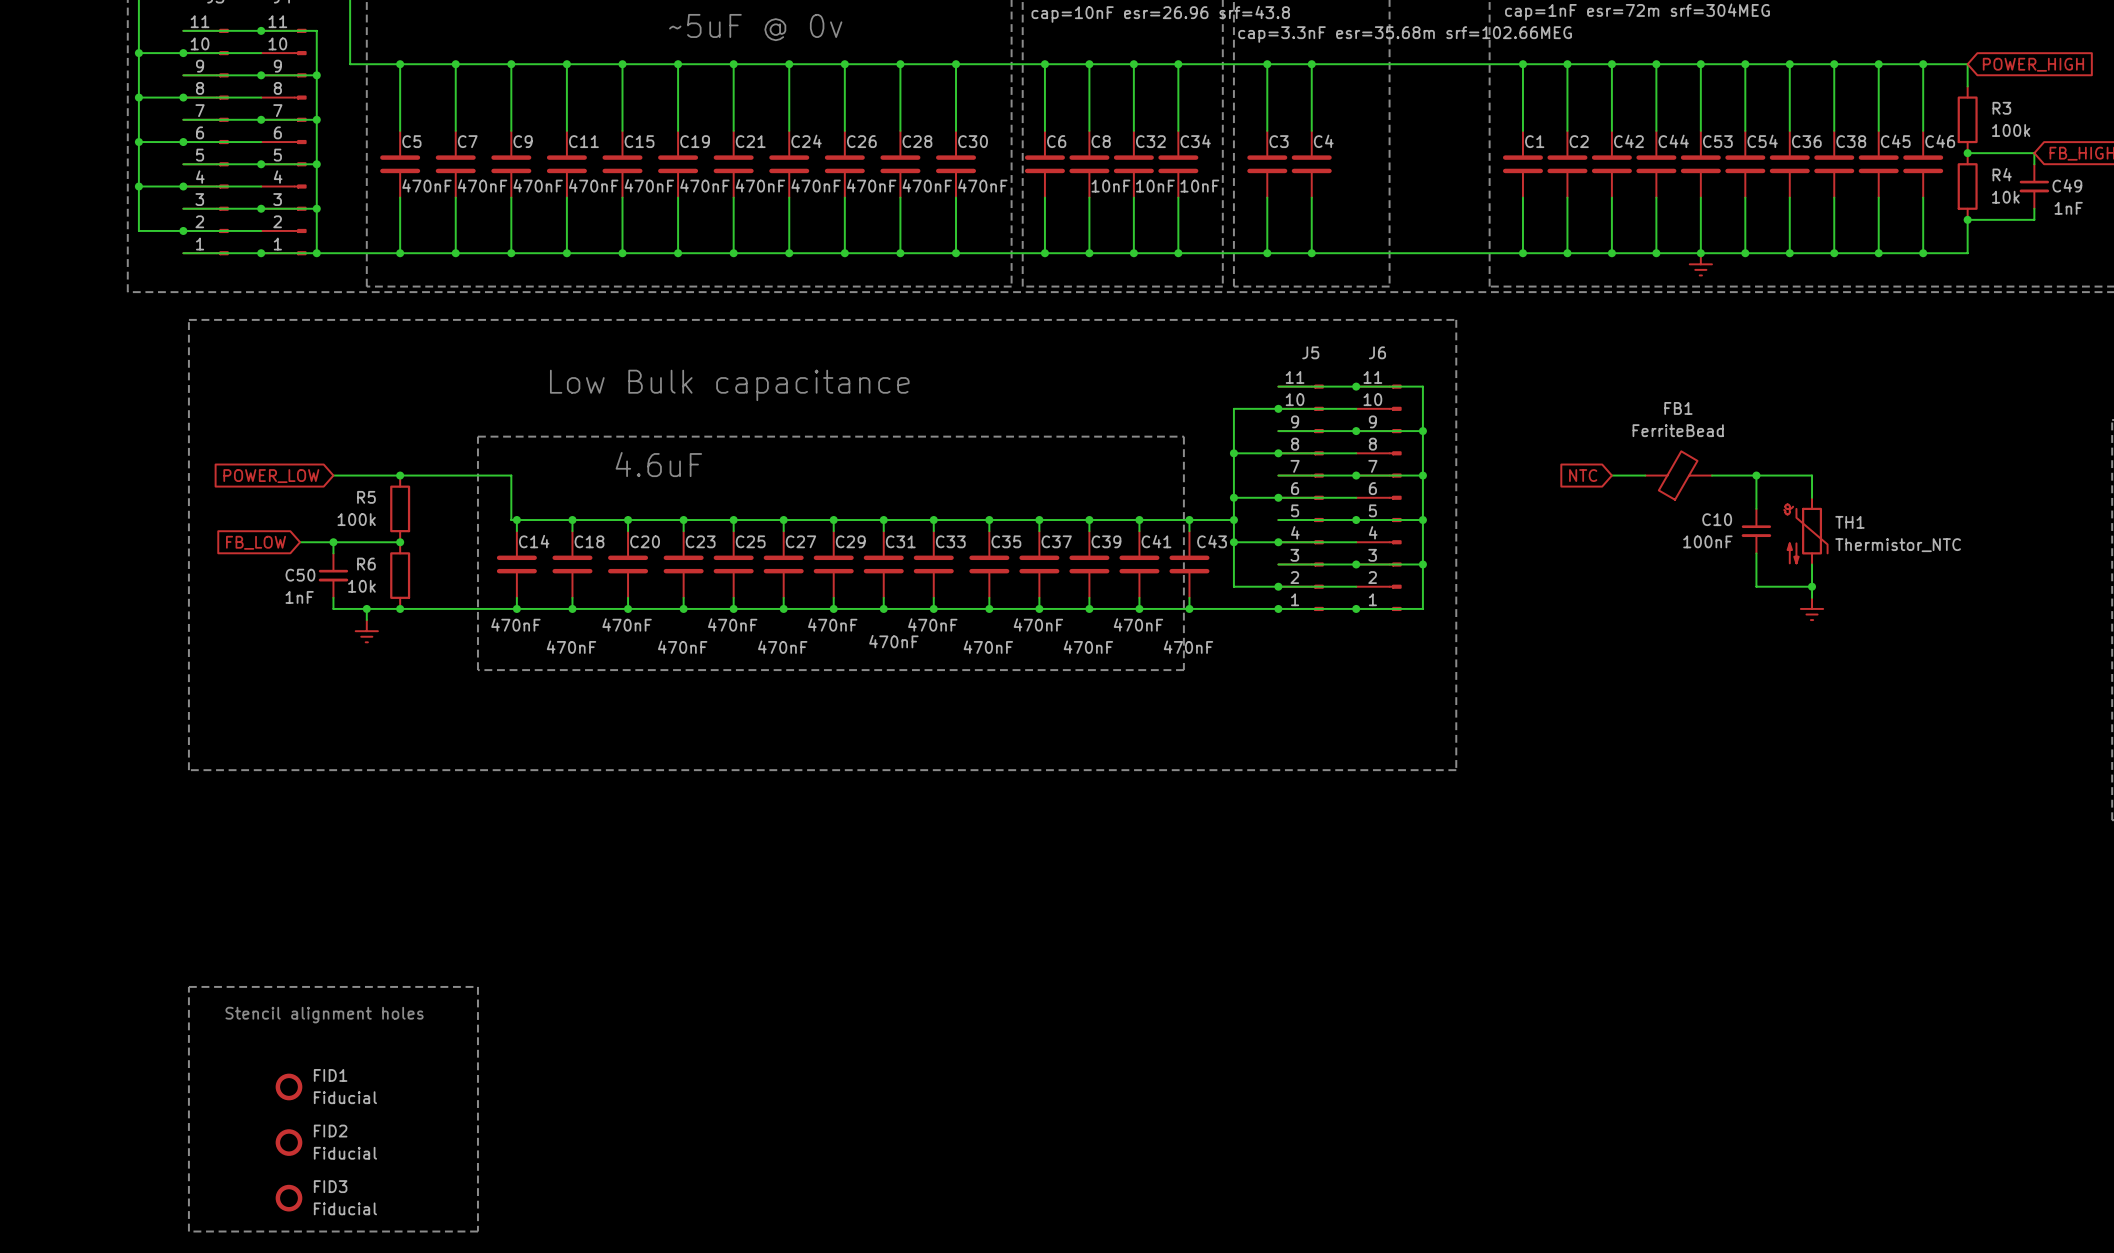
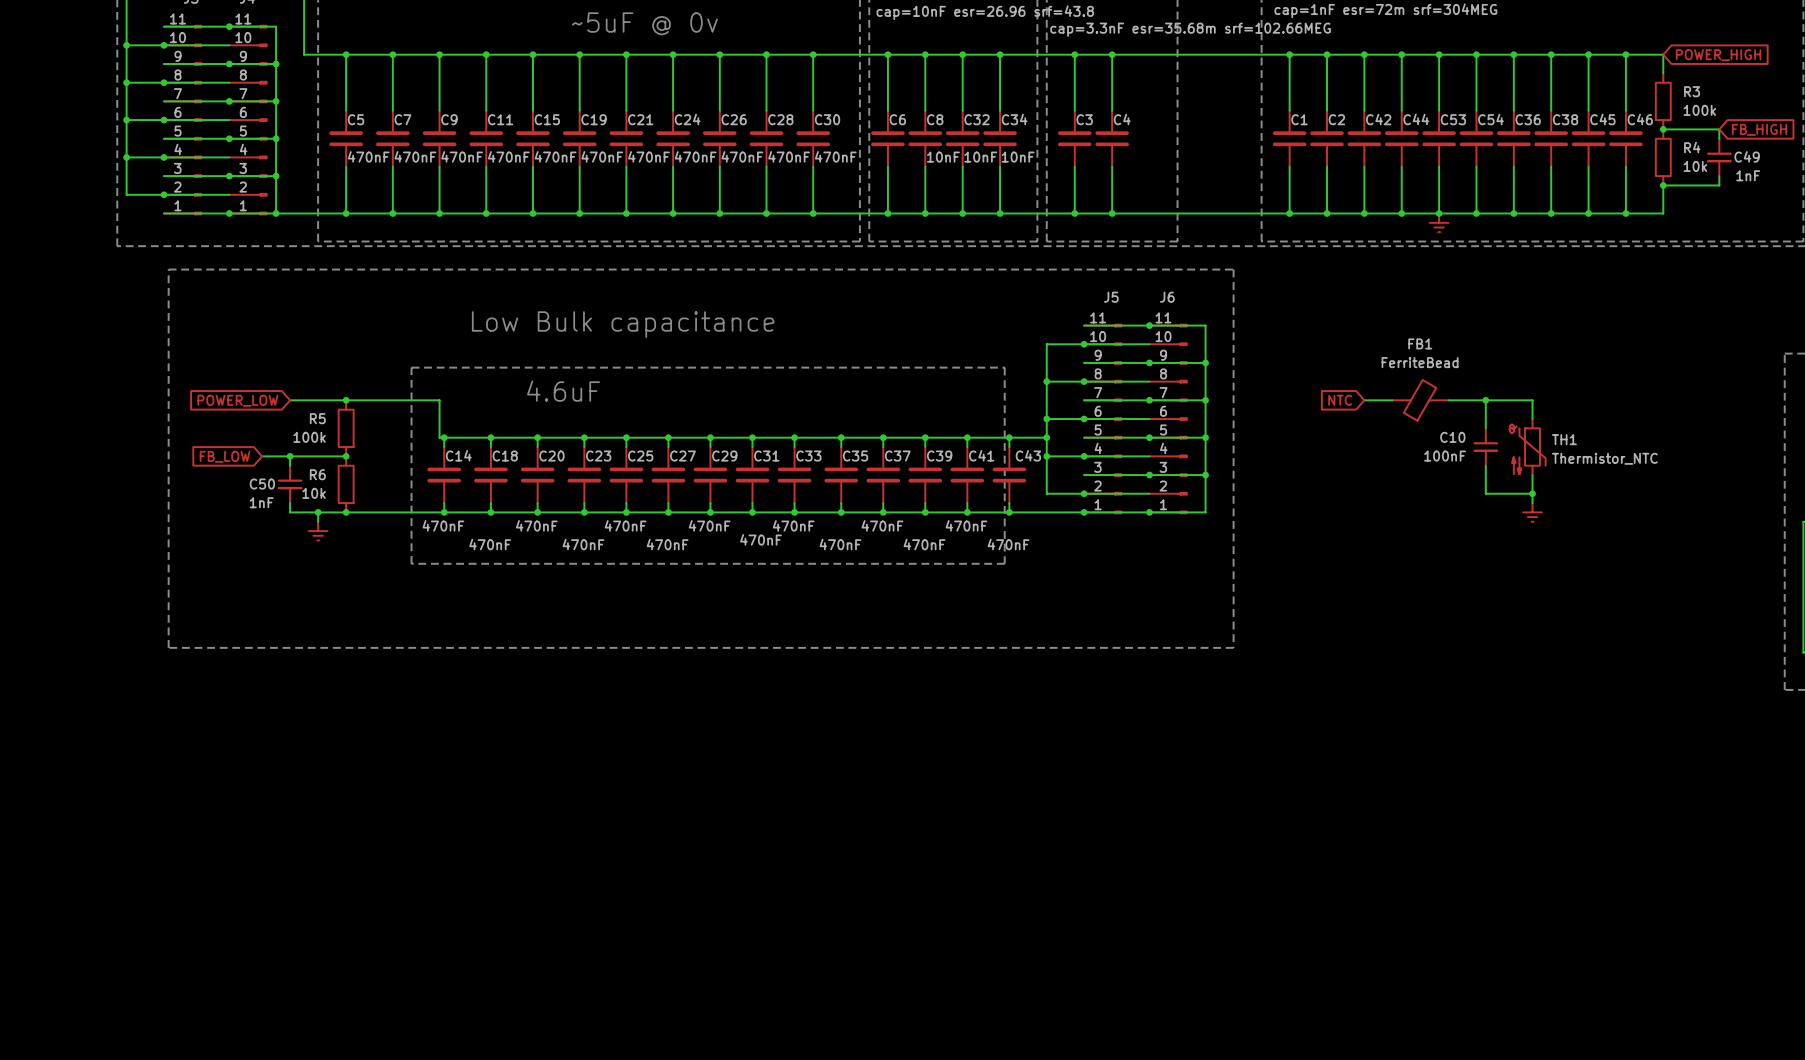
line: (188, 986) (477, 986) (477, 1231) (188, 1231) (188, 986) -> none
text: Stencil alignment holes (324, 1015) -> none
FID1: Fiducial (288, 1086) -> none
FID2: Fiducial (288, 1142) -> none
FID3: Fiducial (288, 1198) -> none

